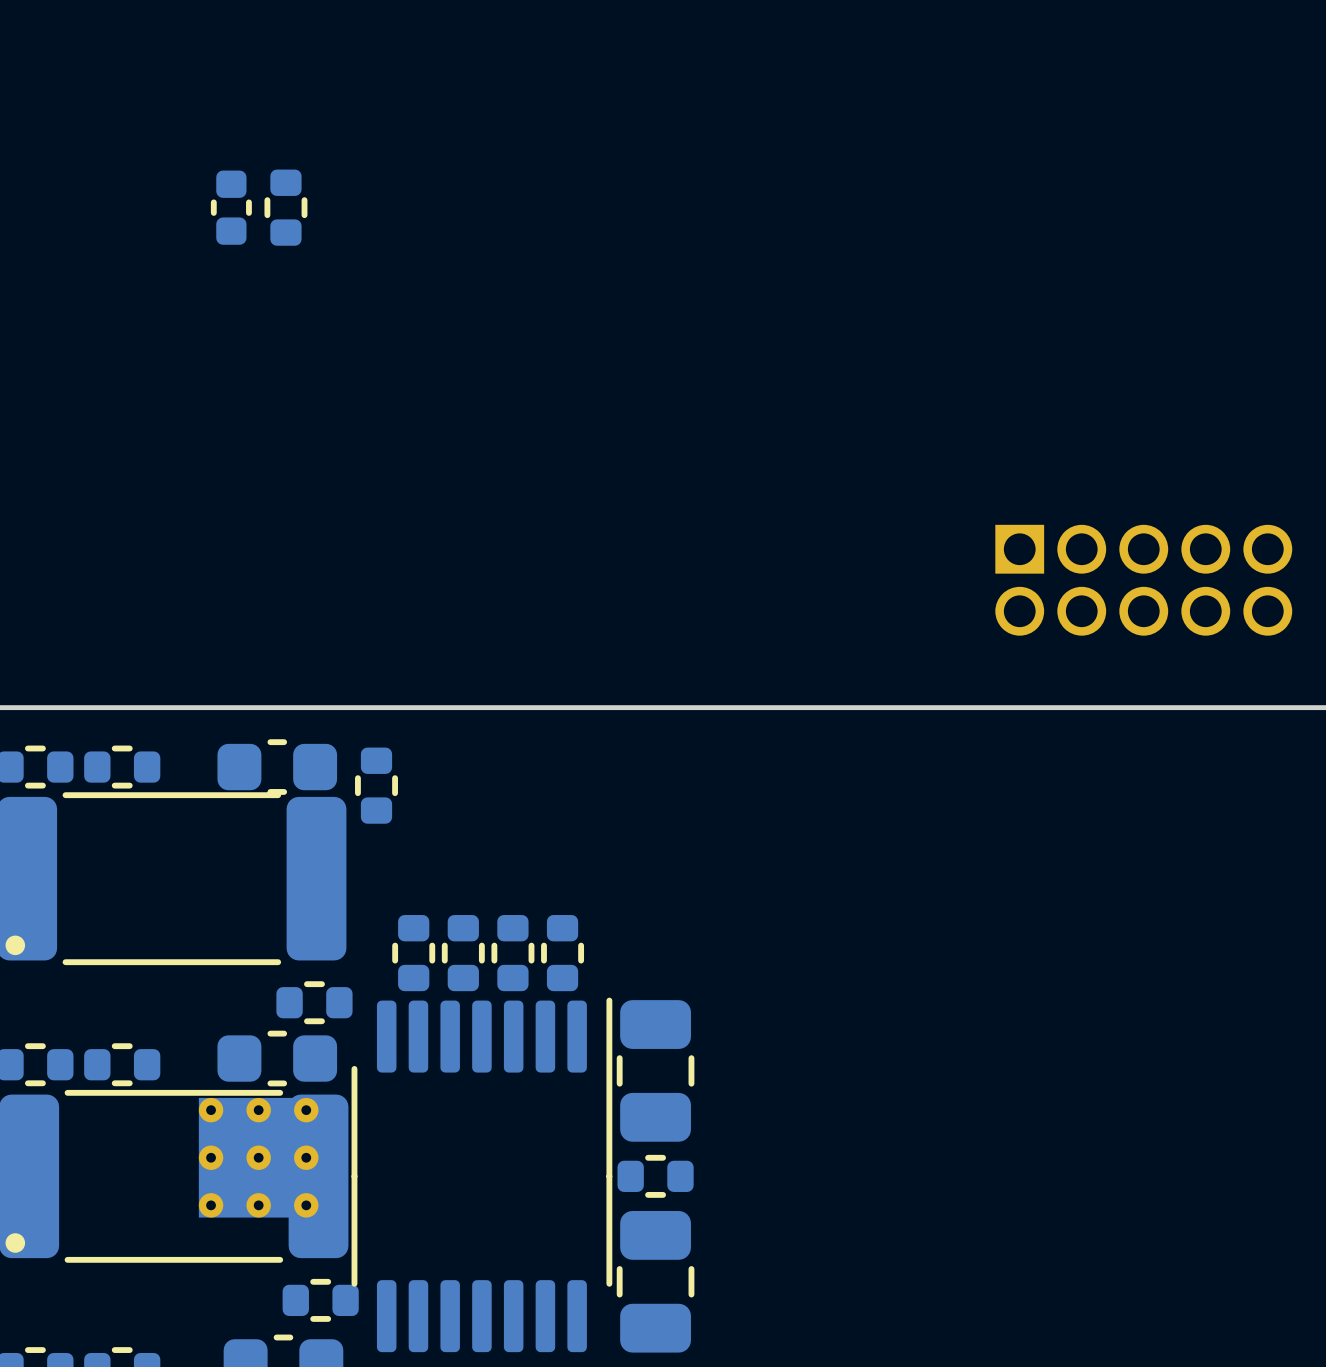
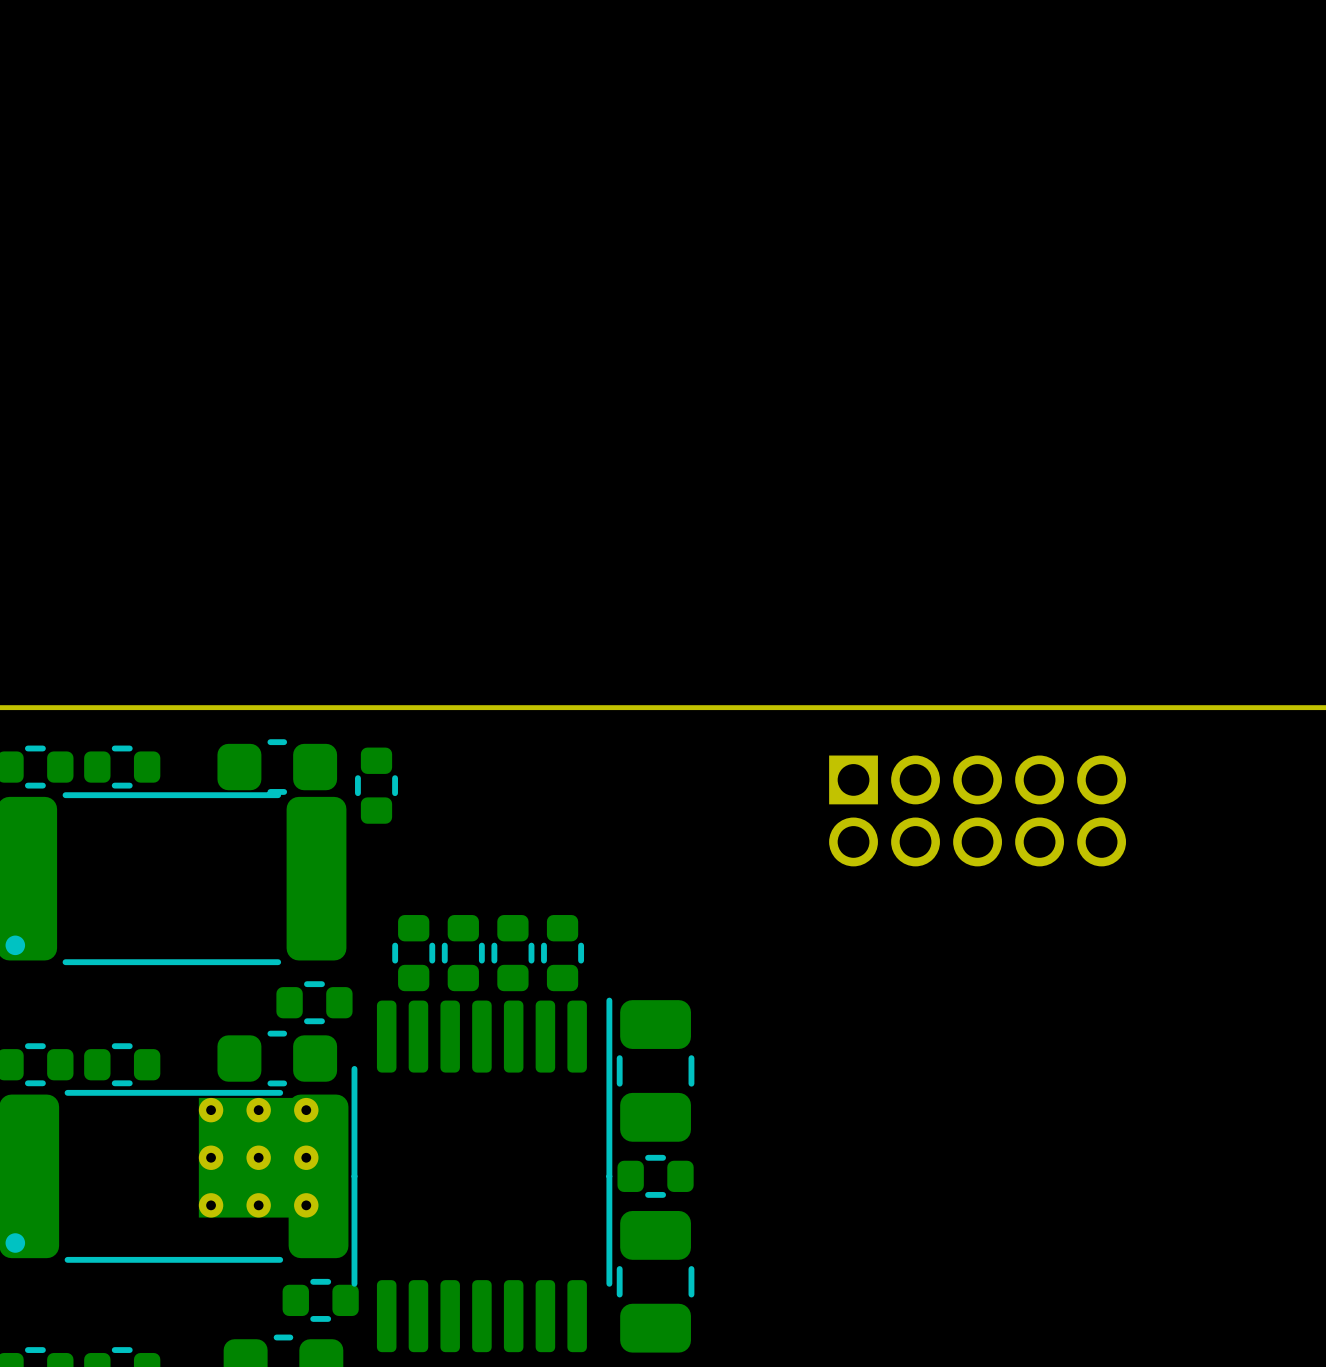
part: (231, 207) -> none
part: (285, 207) -> none
part position: (1143, 580) -> (977, 810)

